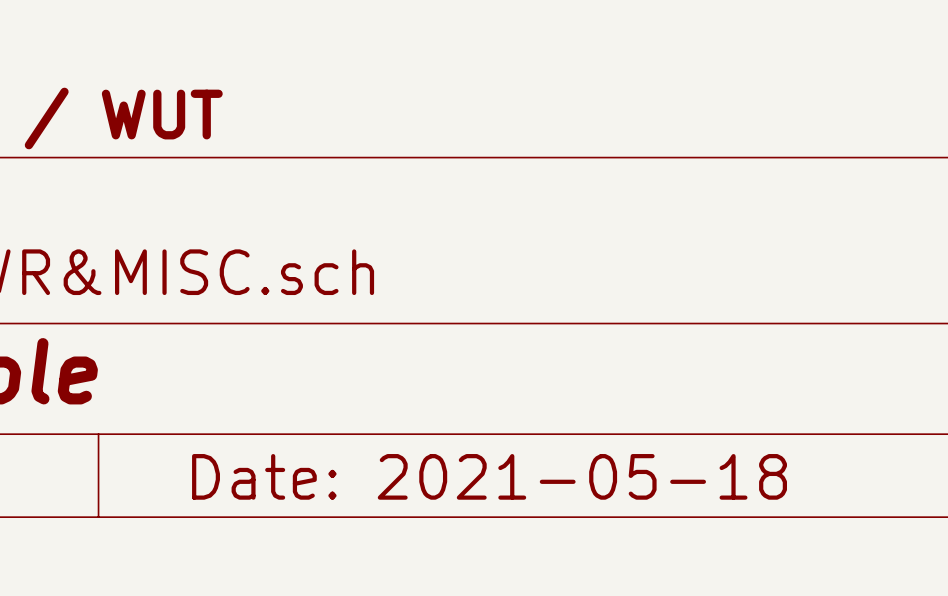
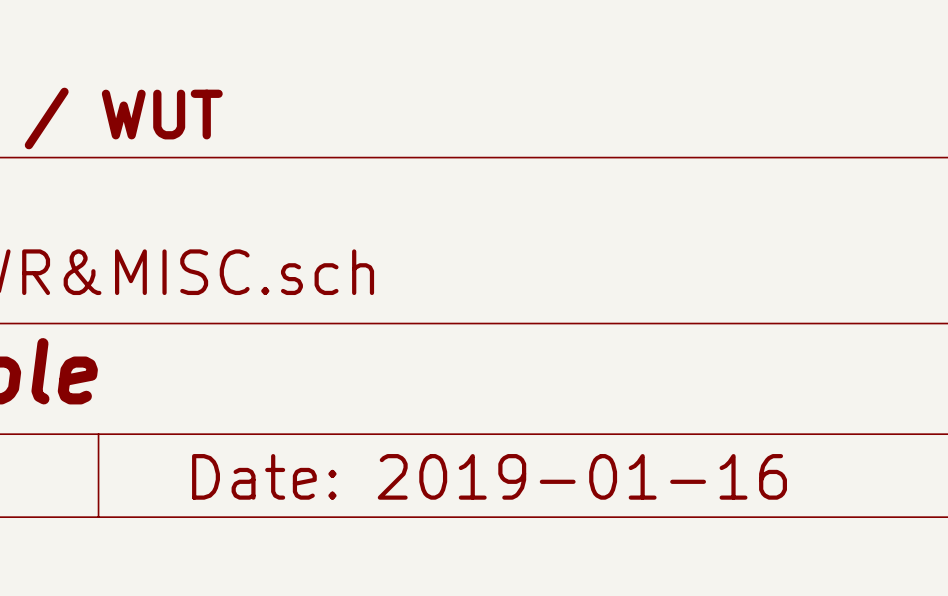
title block: Date: 2021-05-18 (489, 476) -> Date: 2019-01-16 (489, 476)

